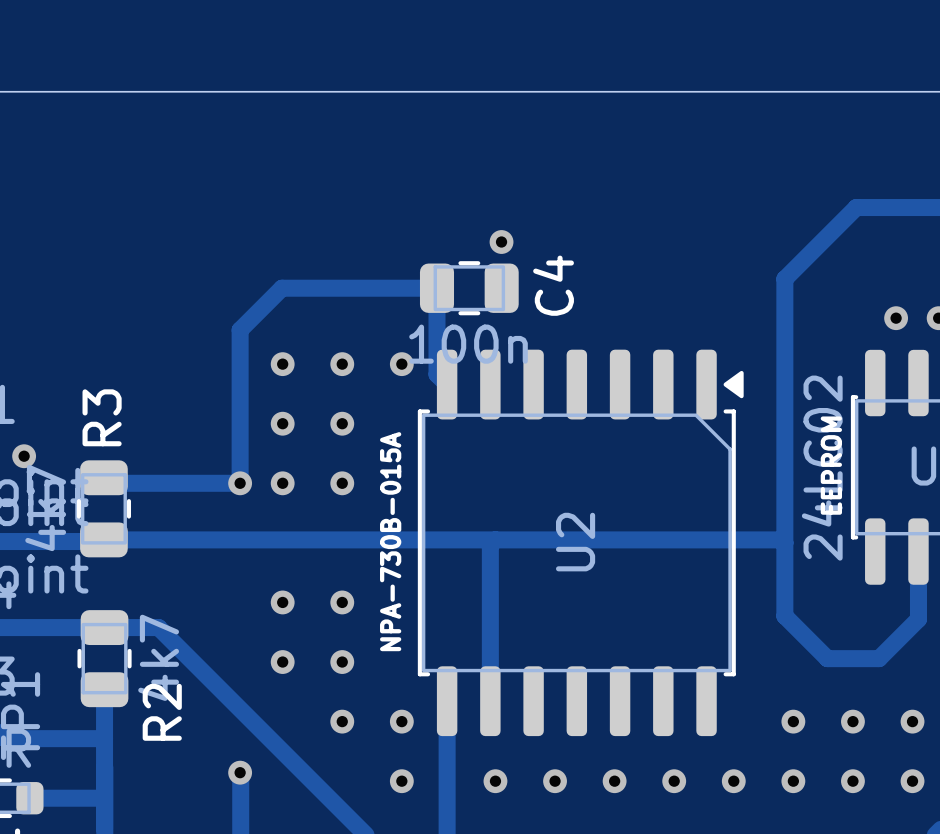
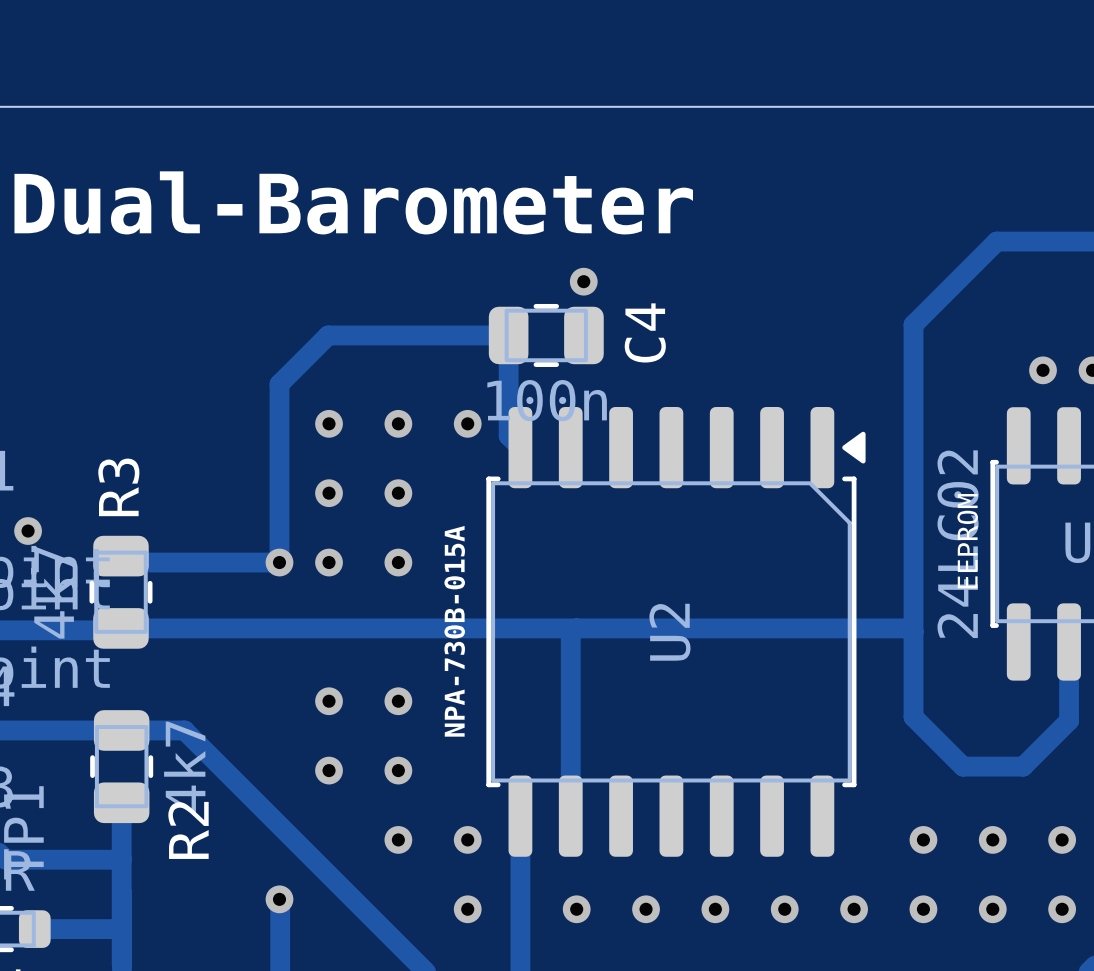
text: none -> Dual-Barometer (353, 202)

